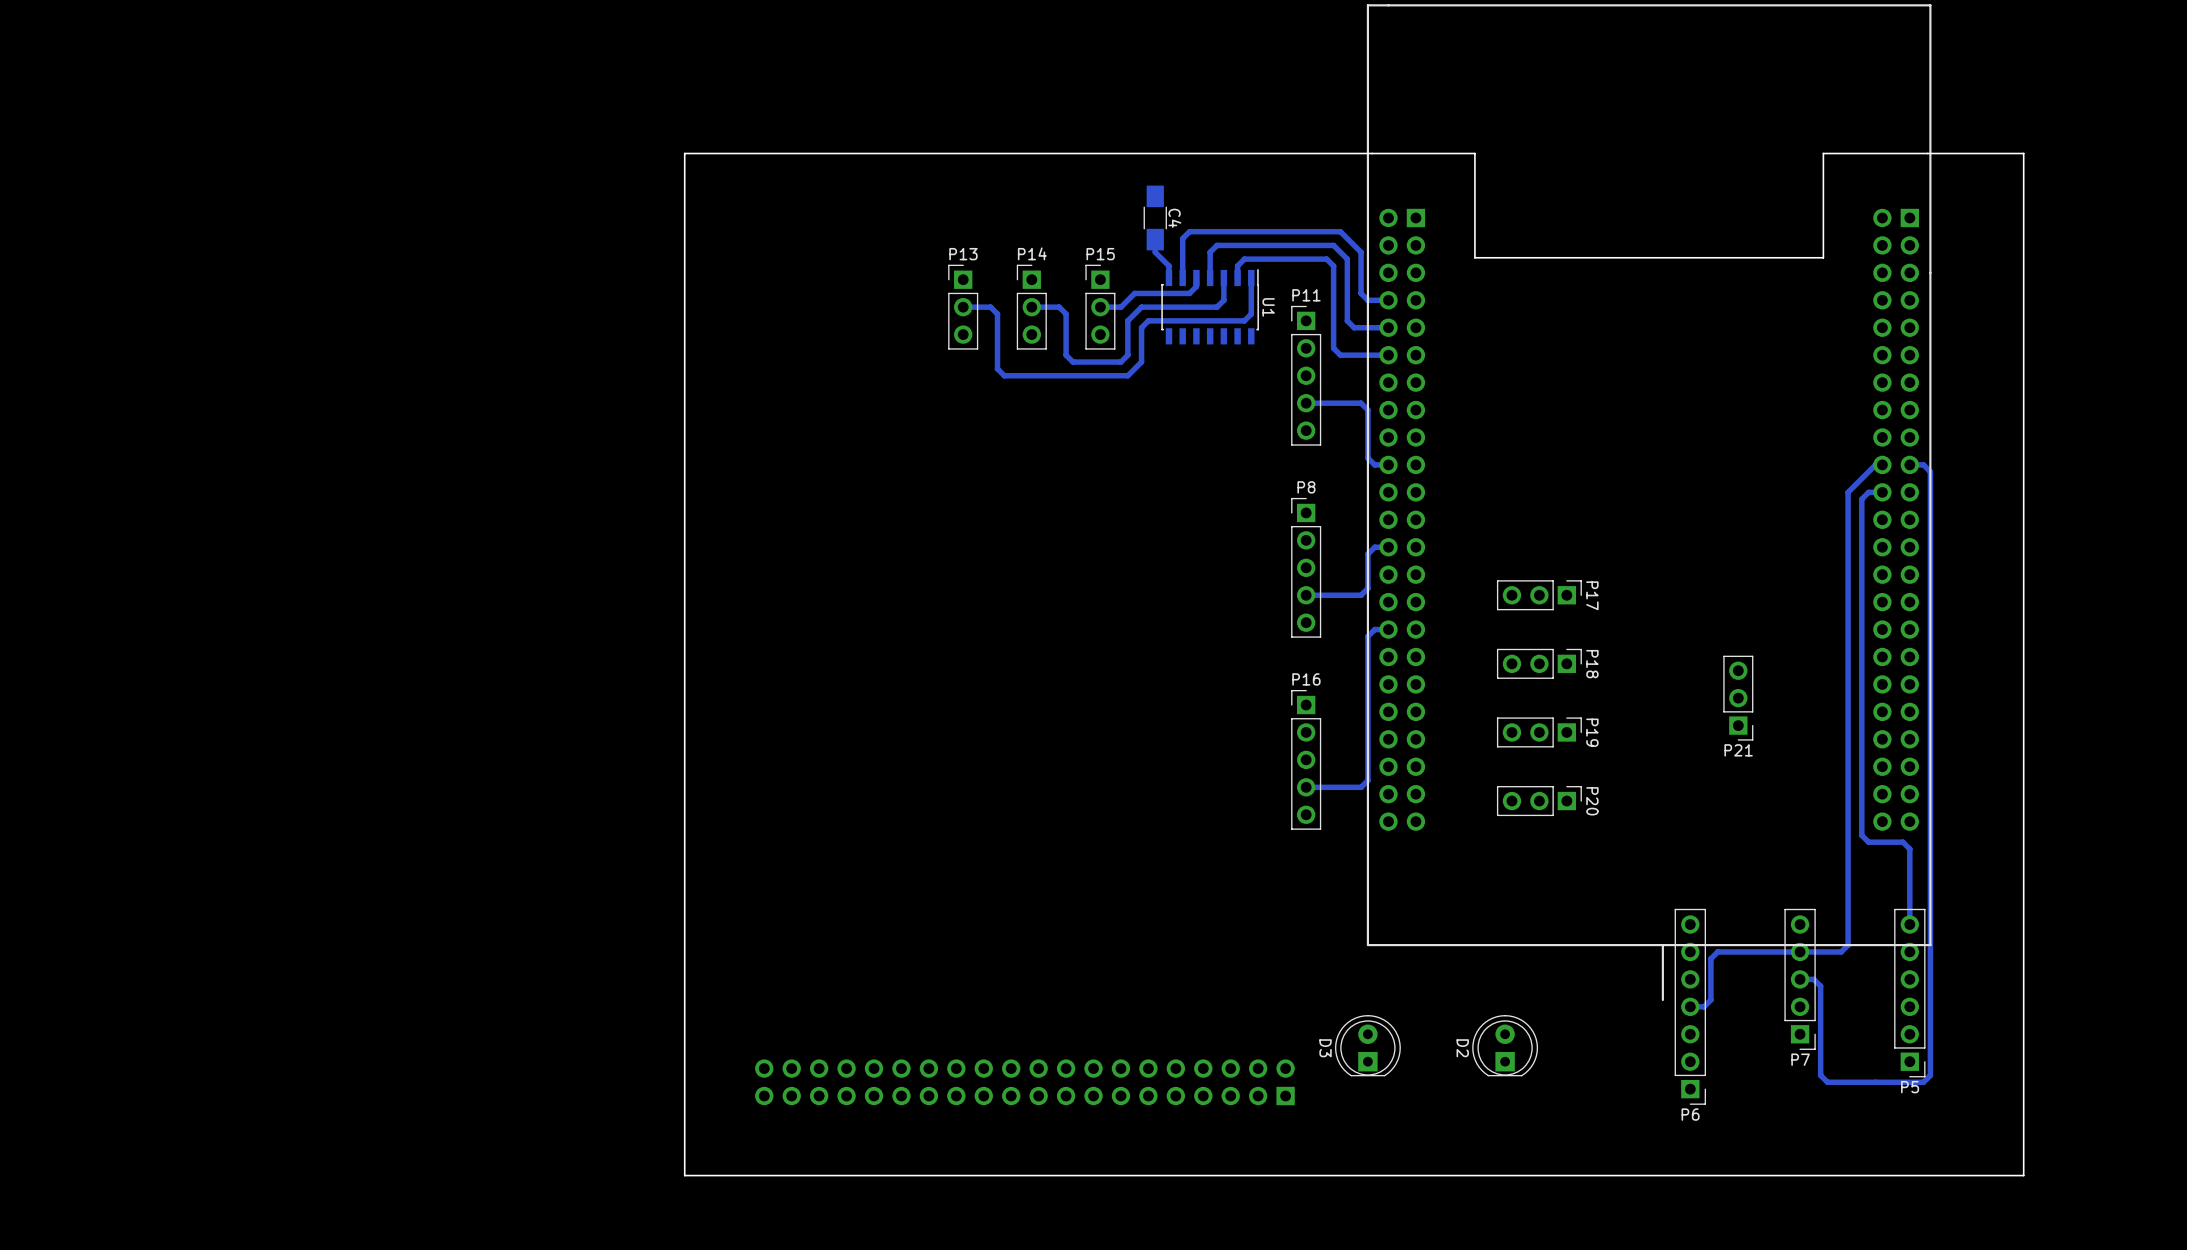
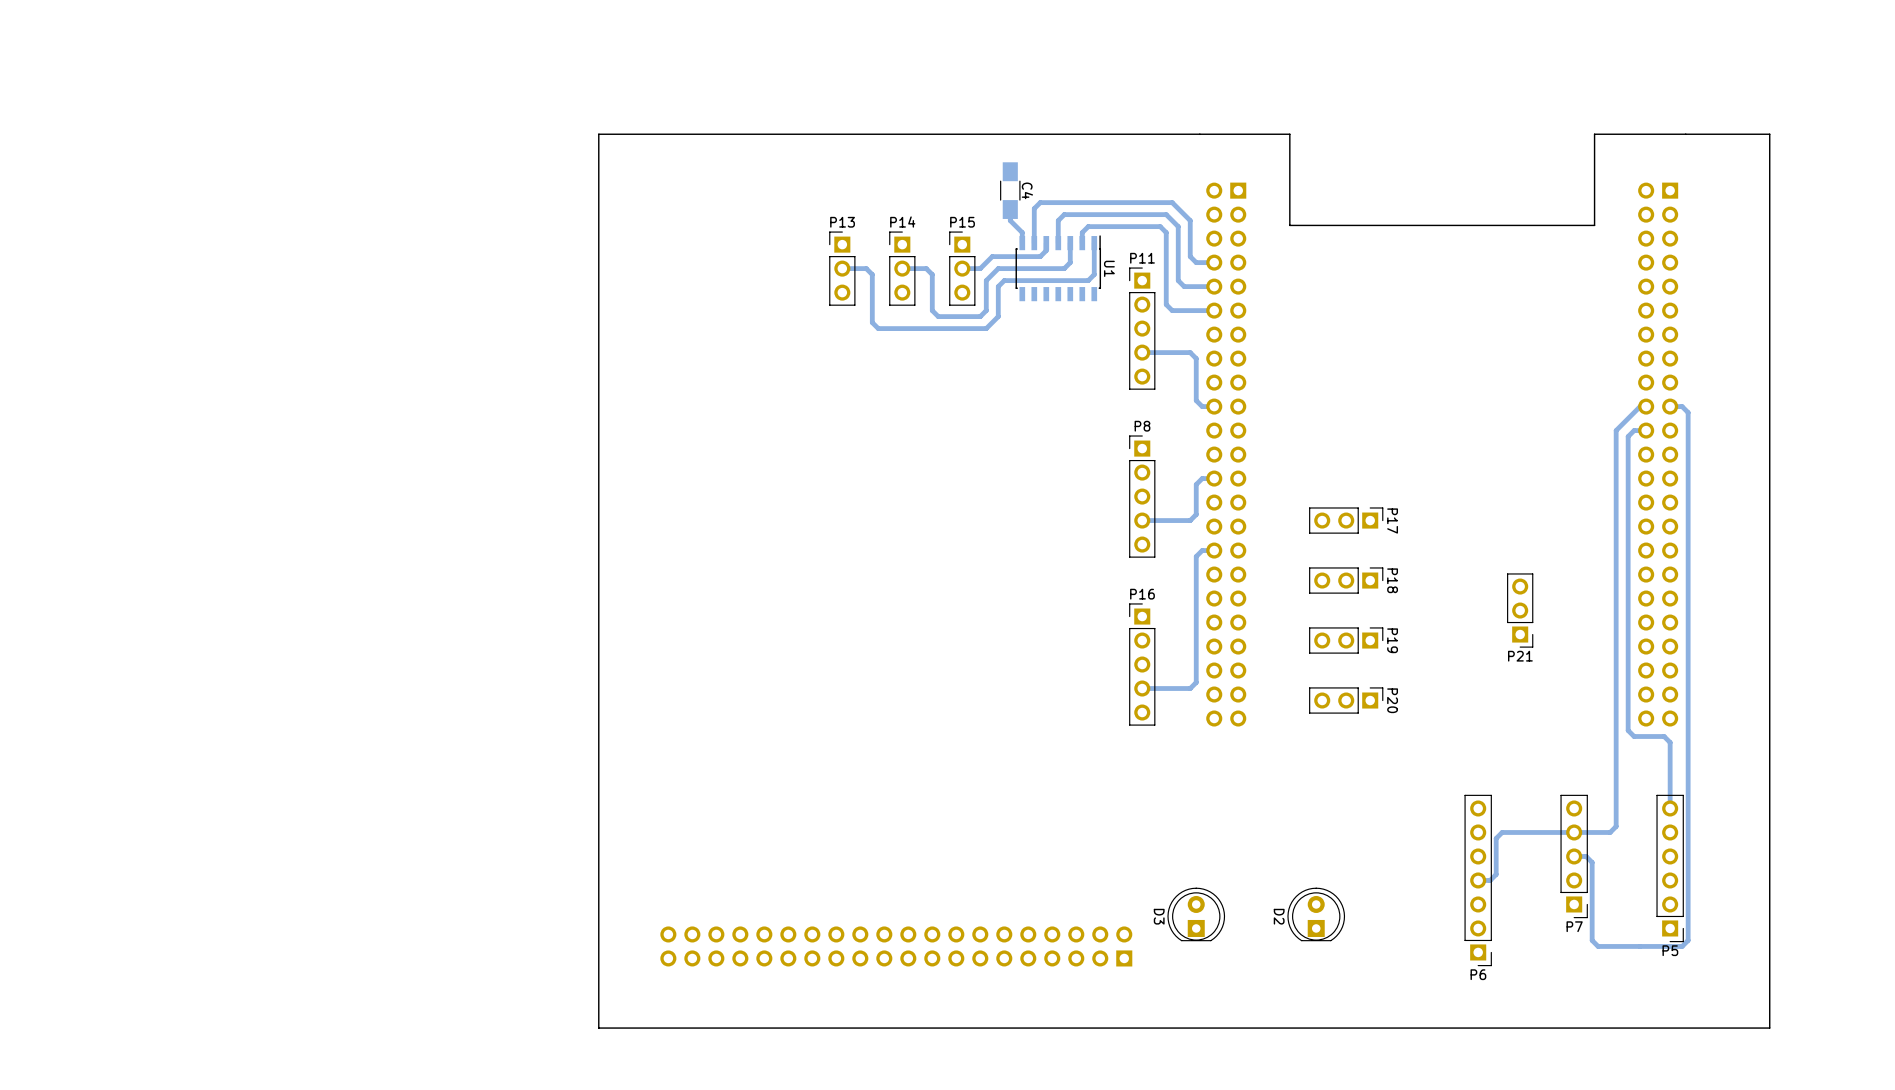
line: (1930, 5) (1930, 945) (1367, 945) (1367, 5) (1930, 5) -> none
line: (1662, 945) (1662, 999) -> none

